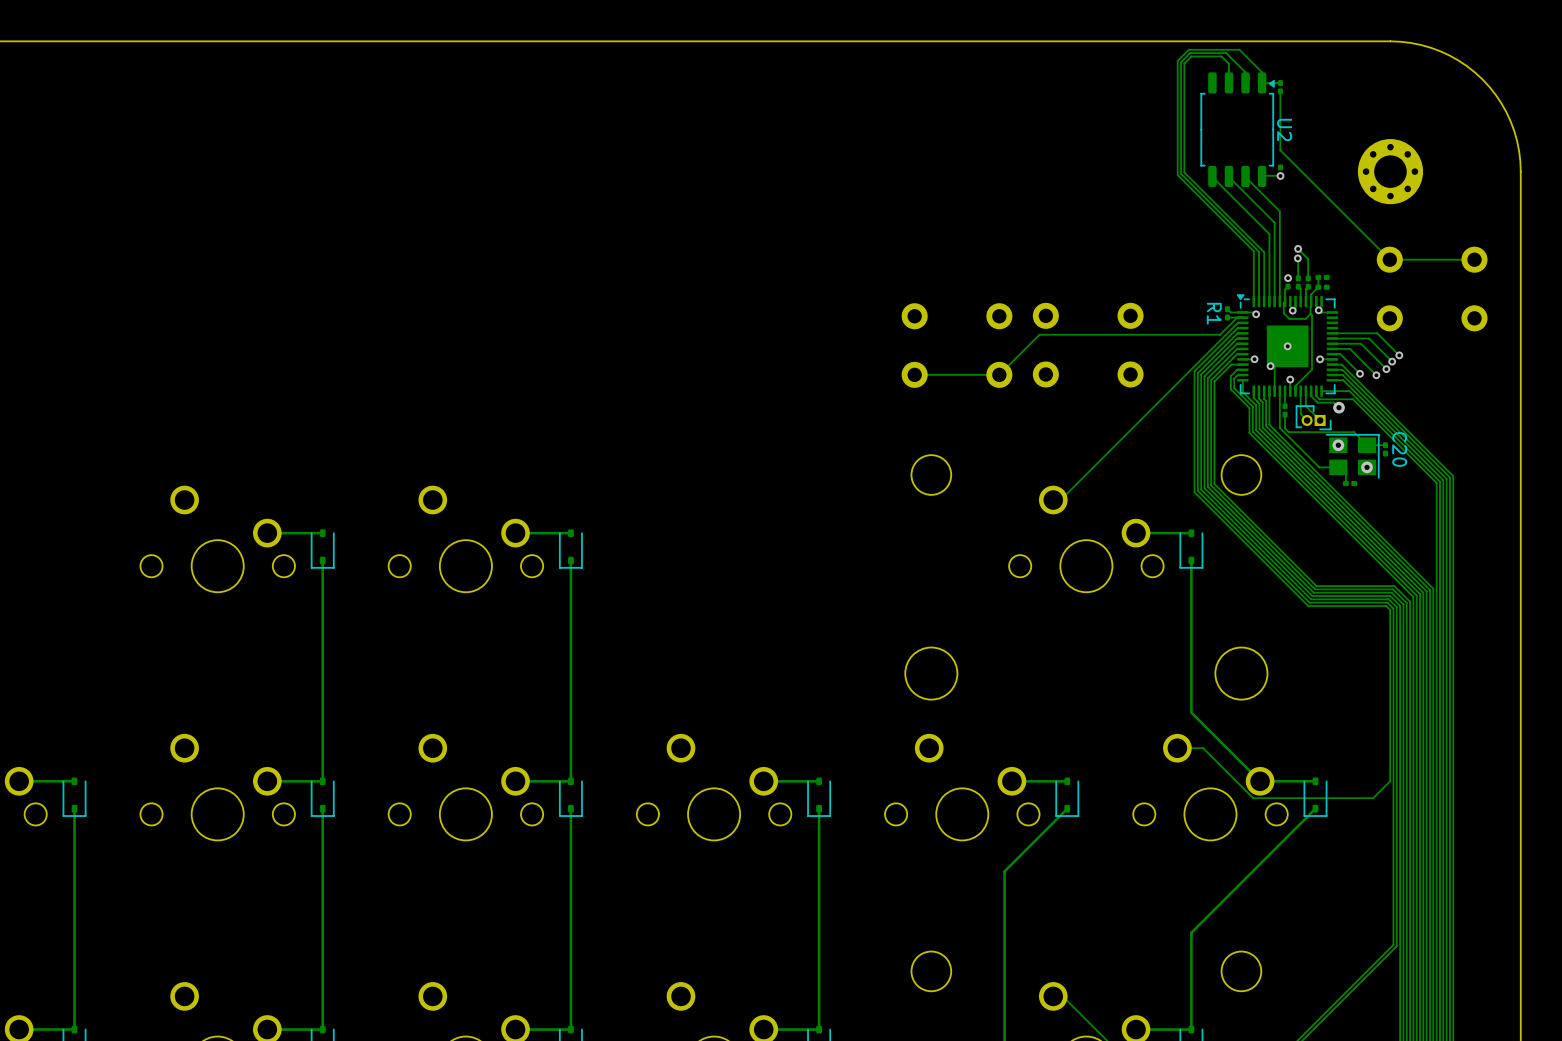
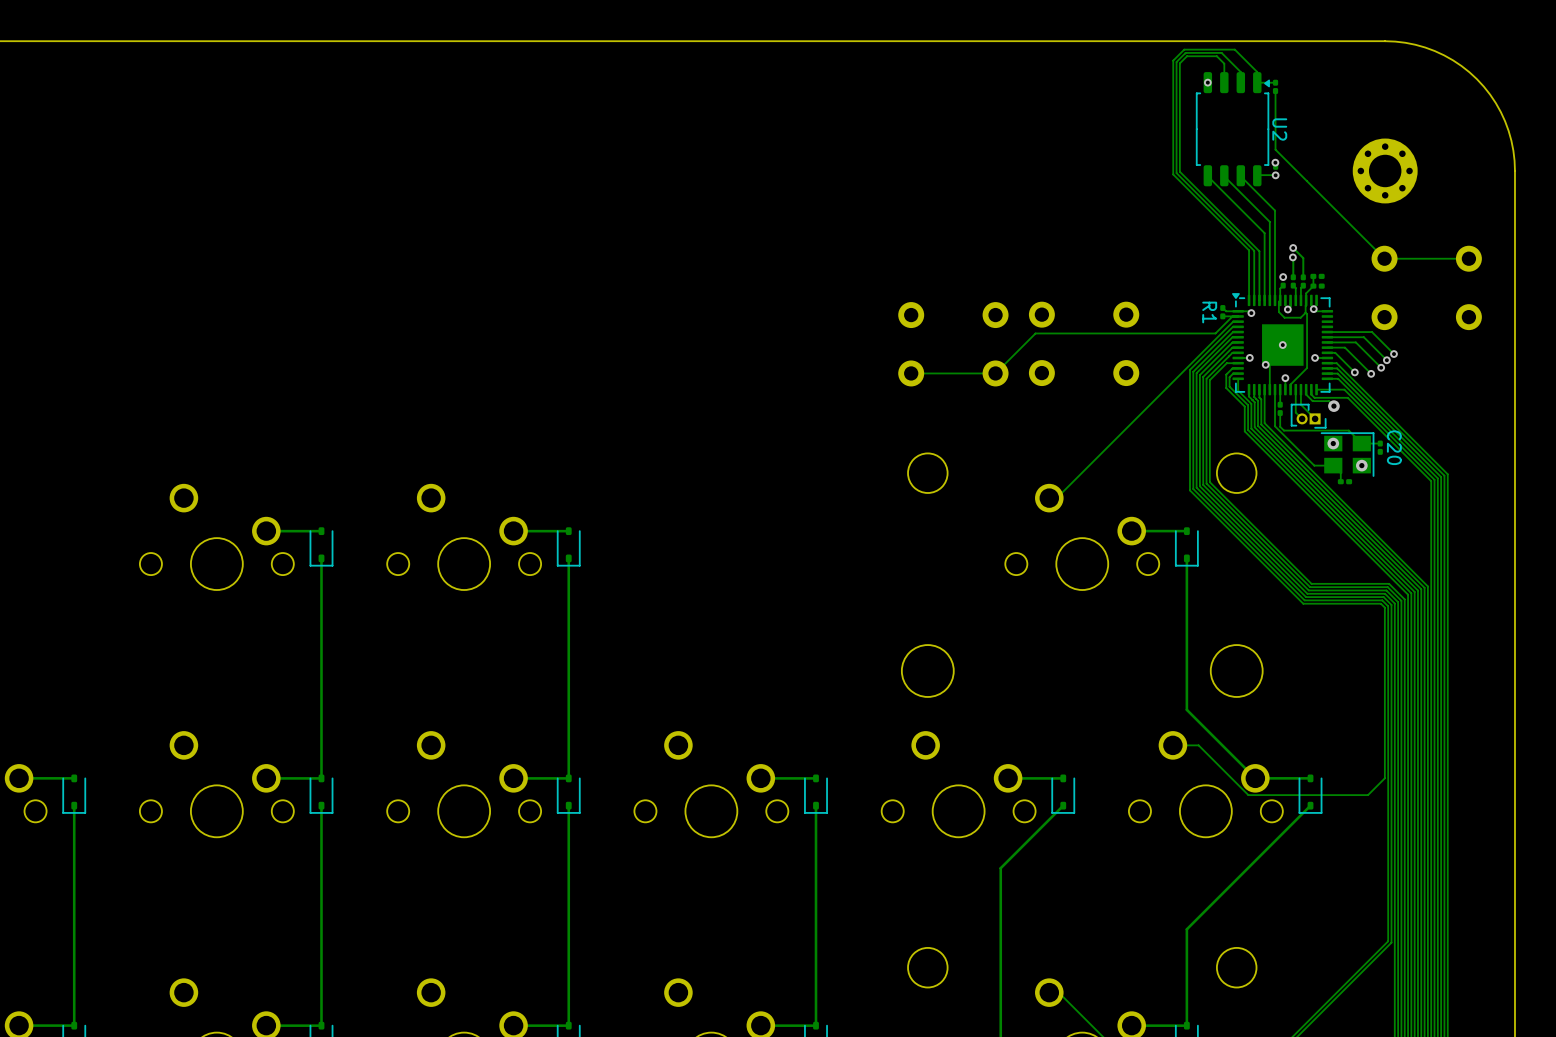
via: none -> (1207, 82)
via: none -> (1275, 162)

